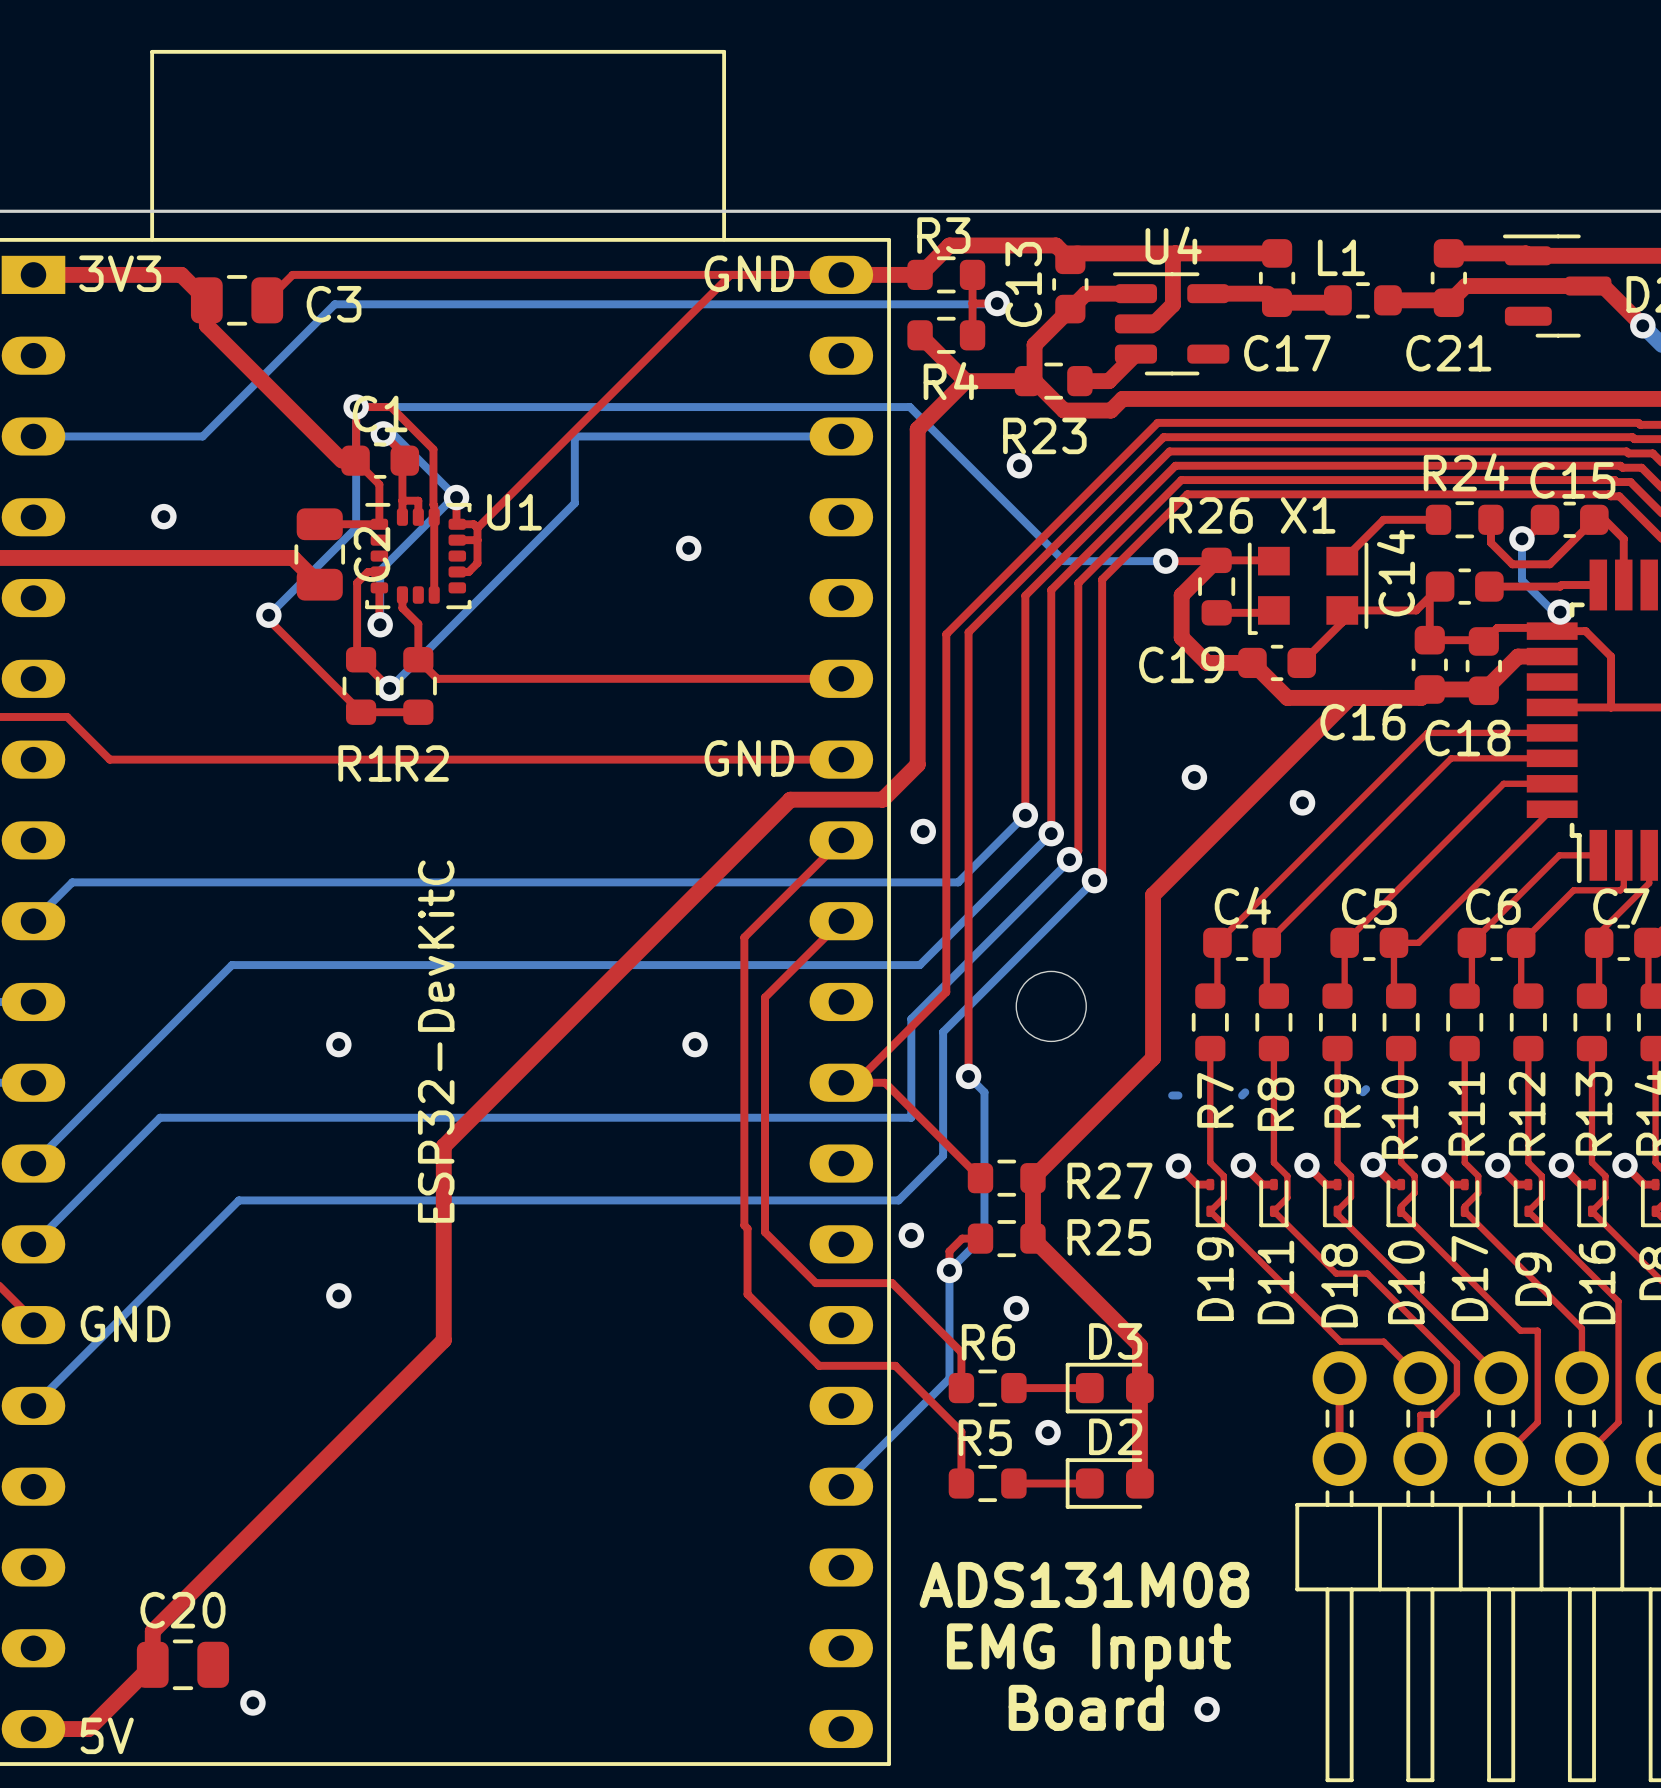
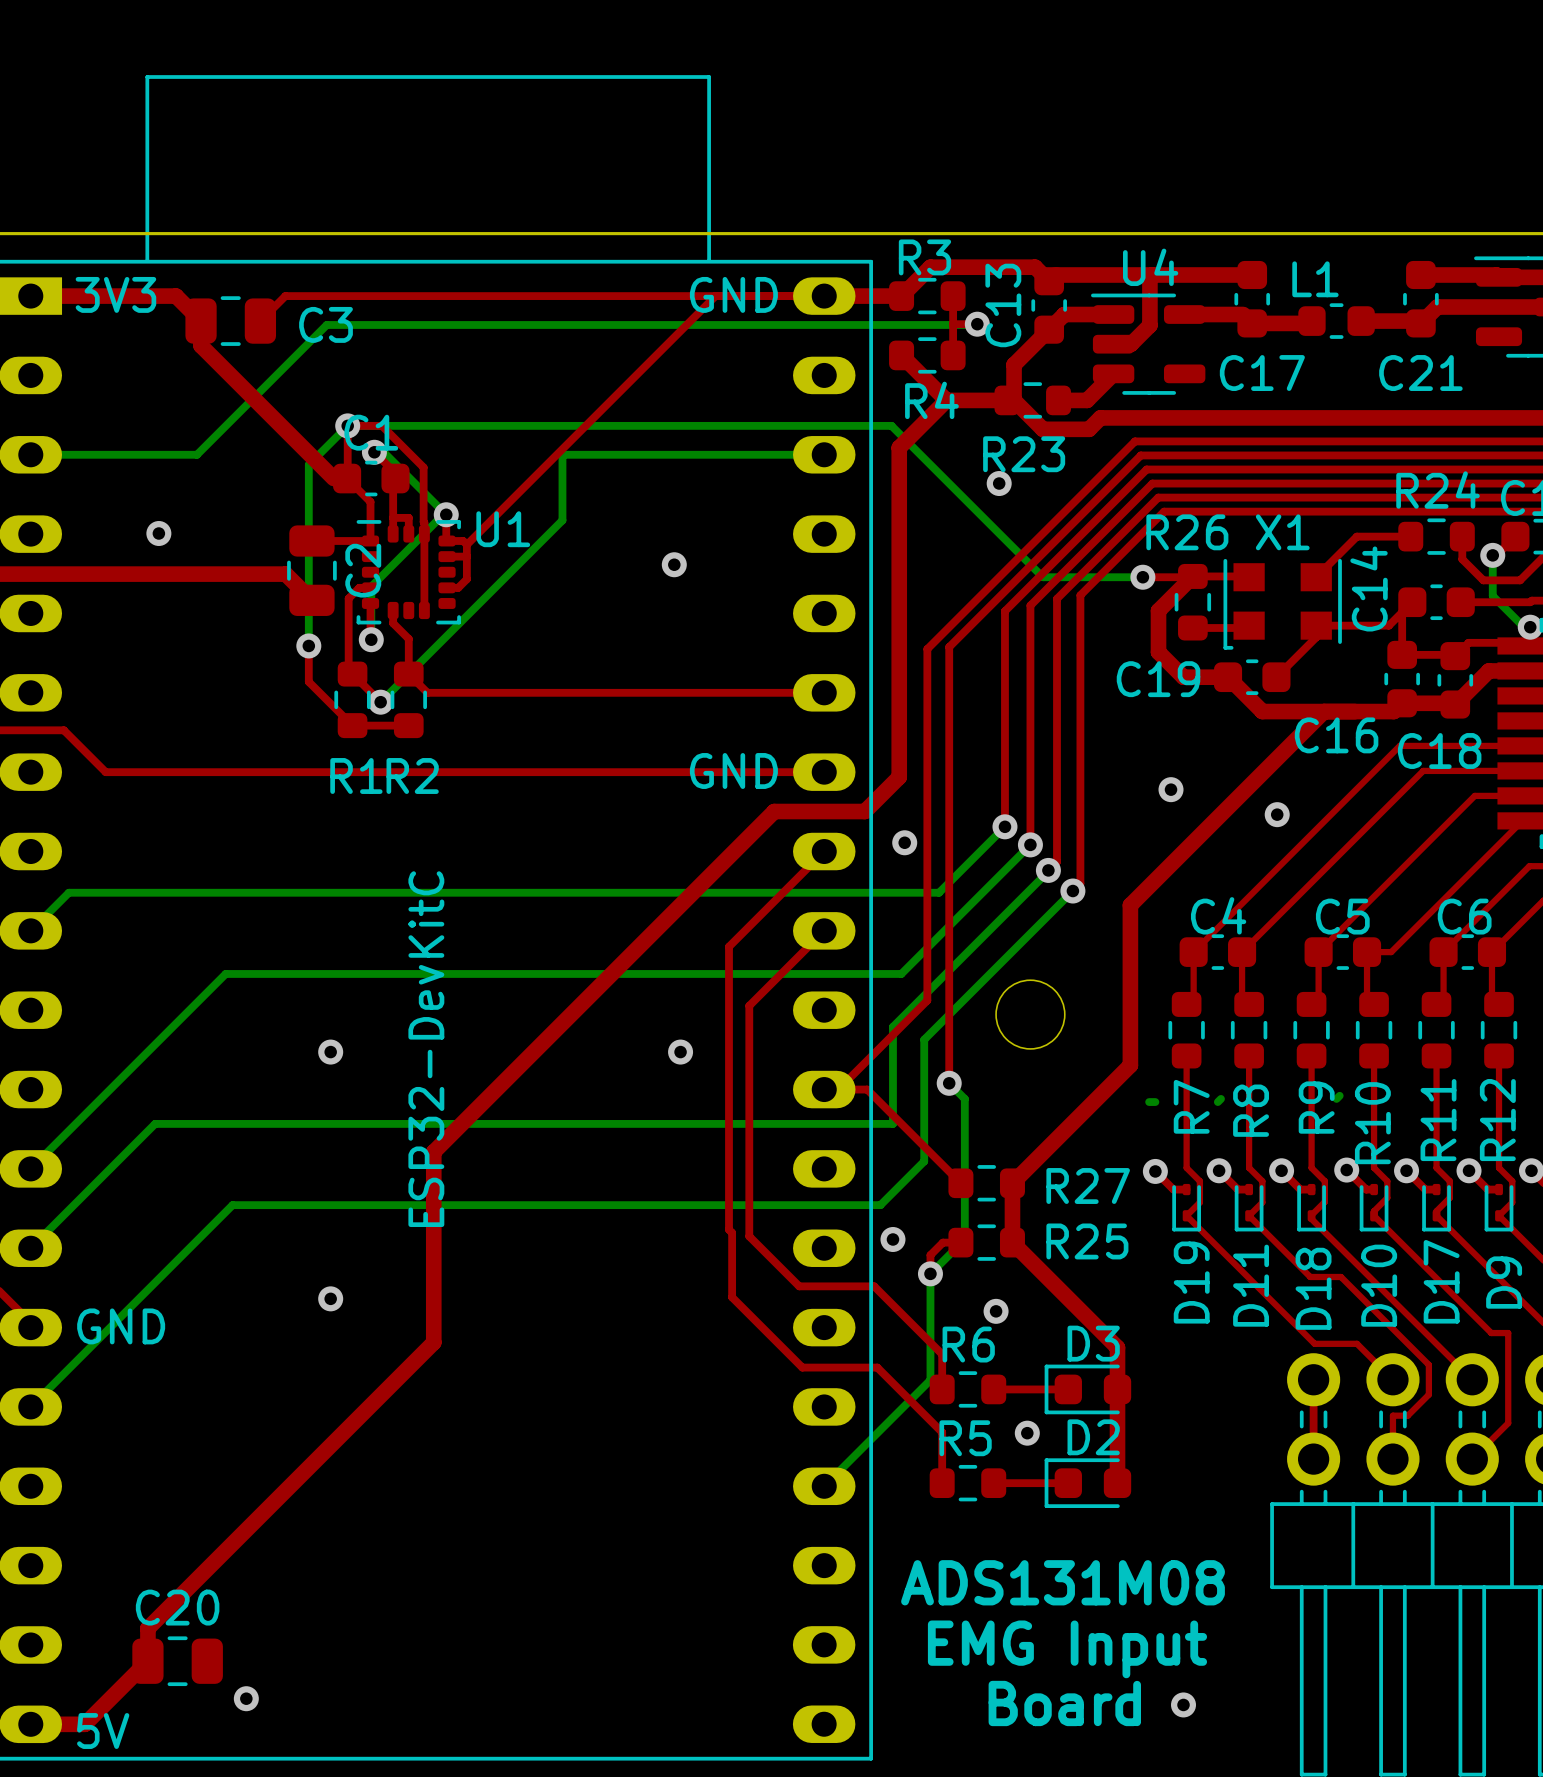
bottom track: (356, 407) (356, 527) (268, 615) -> (347, 425) (308, 464) (308, 645)
top track: (268, 615) (268, 619) (316, 667) -> (308, 645) (308, 681)
via position: (268, 615) -> (308, 645)

